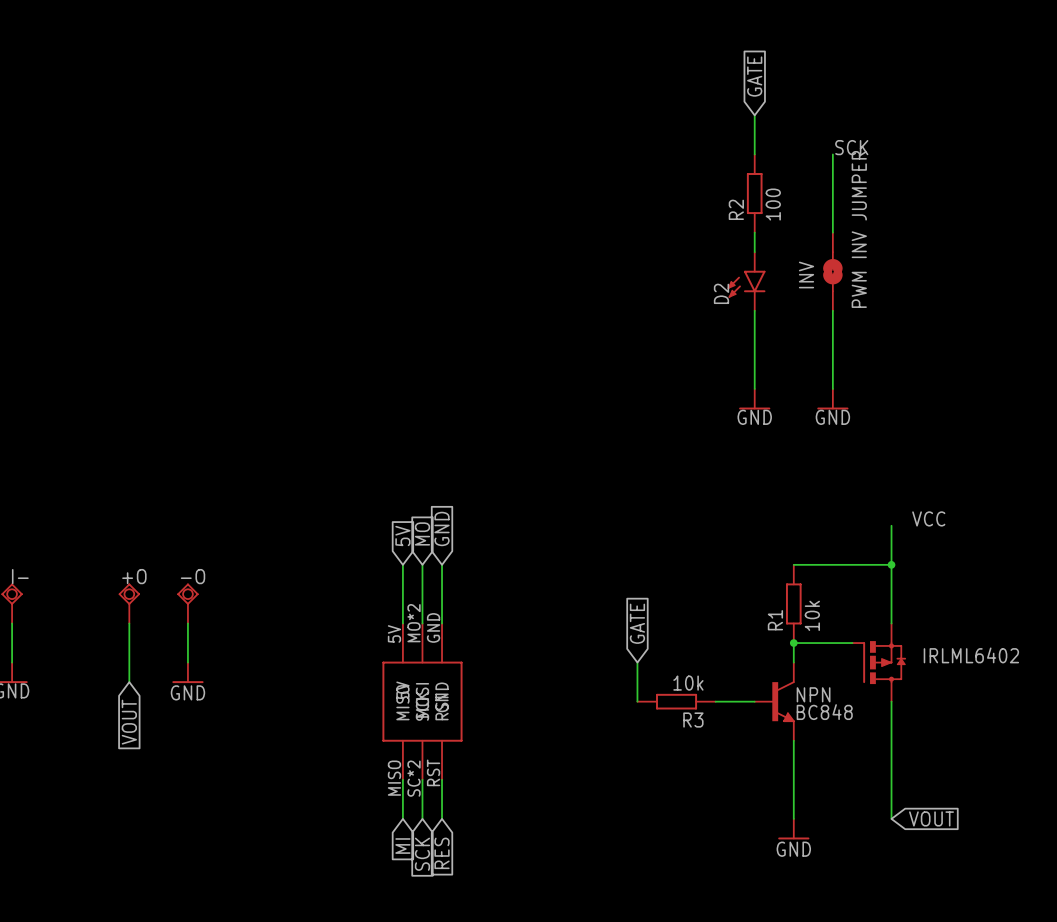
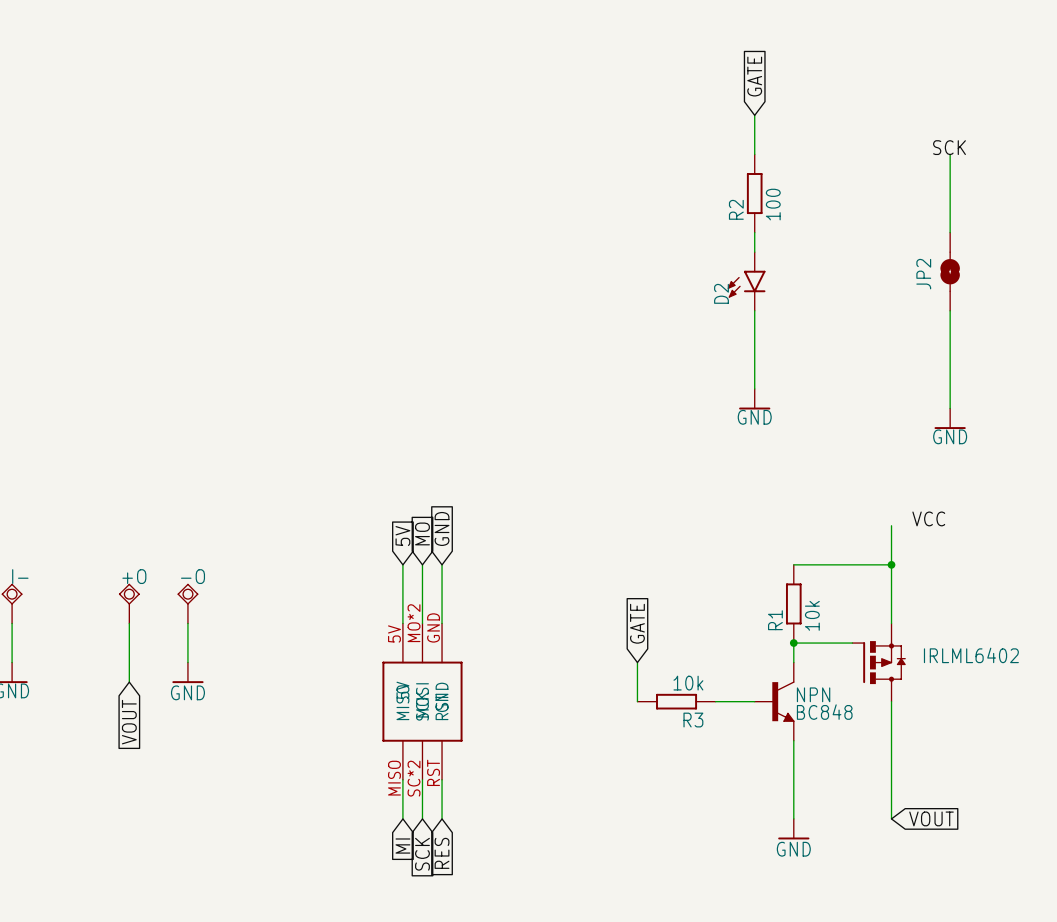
label position: SCK (851, 147) -> SCK (949, 147)
wire: (832, 154) (832, 232) -> (950, 154) (950, 232)
INV: PWM INV JUMPER (832, 271) -> none
JP2: none -> (950, 271)
wire: (832, 310) (832, 388) -> none
wire: none -> (950, 310) (950, 408)
power symbol position: GND (832, 399) -> GND (950, 418)

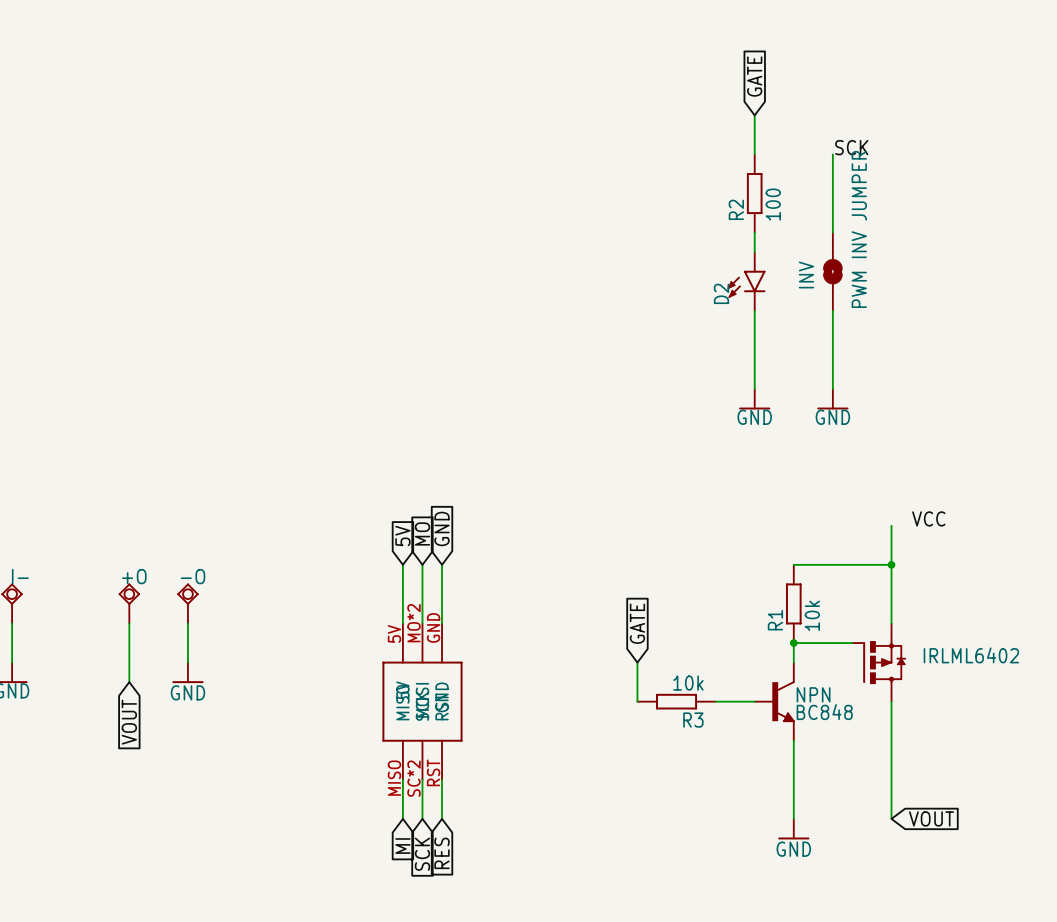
label position: SCK (949, 147) -> SCK (851, 147)
wire: (950, 154) (950, 232) -> (832, 154) (832, 232)
INV: none -> PWM INV JUMPER (832, 271)
JP2: (950, 271) -> none
wire: none -> (832, 310) (832, 388)
wire: (950, 310) (950, 408) -> none
power symbol position: GND (950, 418) -> GND (832, 399)

